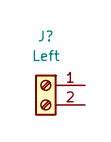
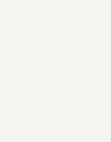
J?: Left (60, 95) -> none

